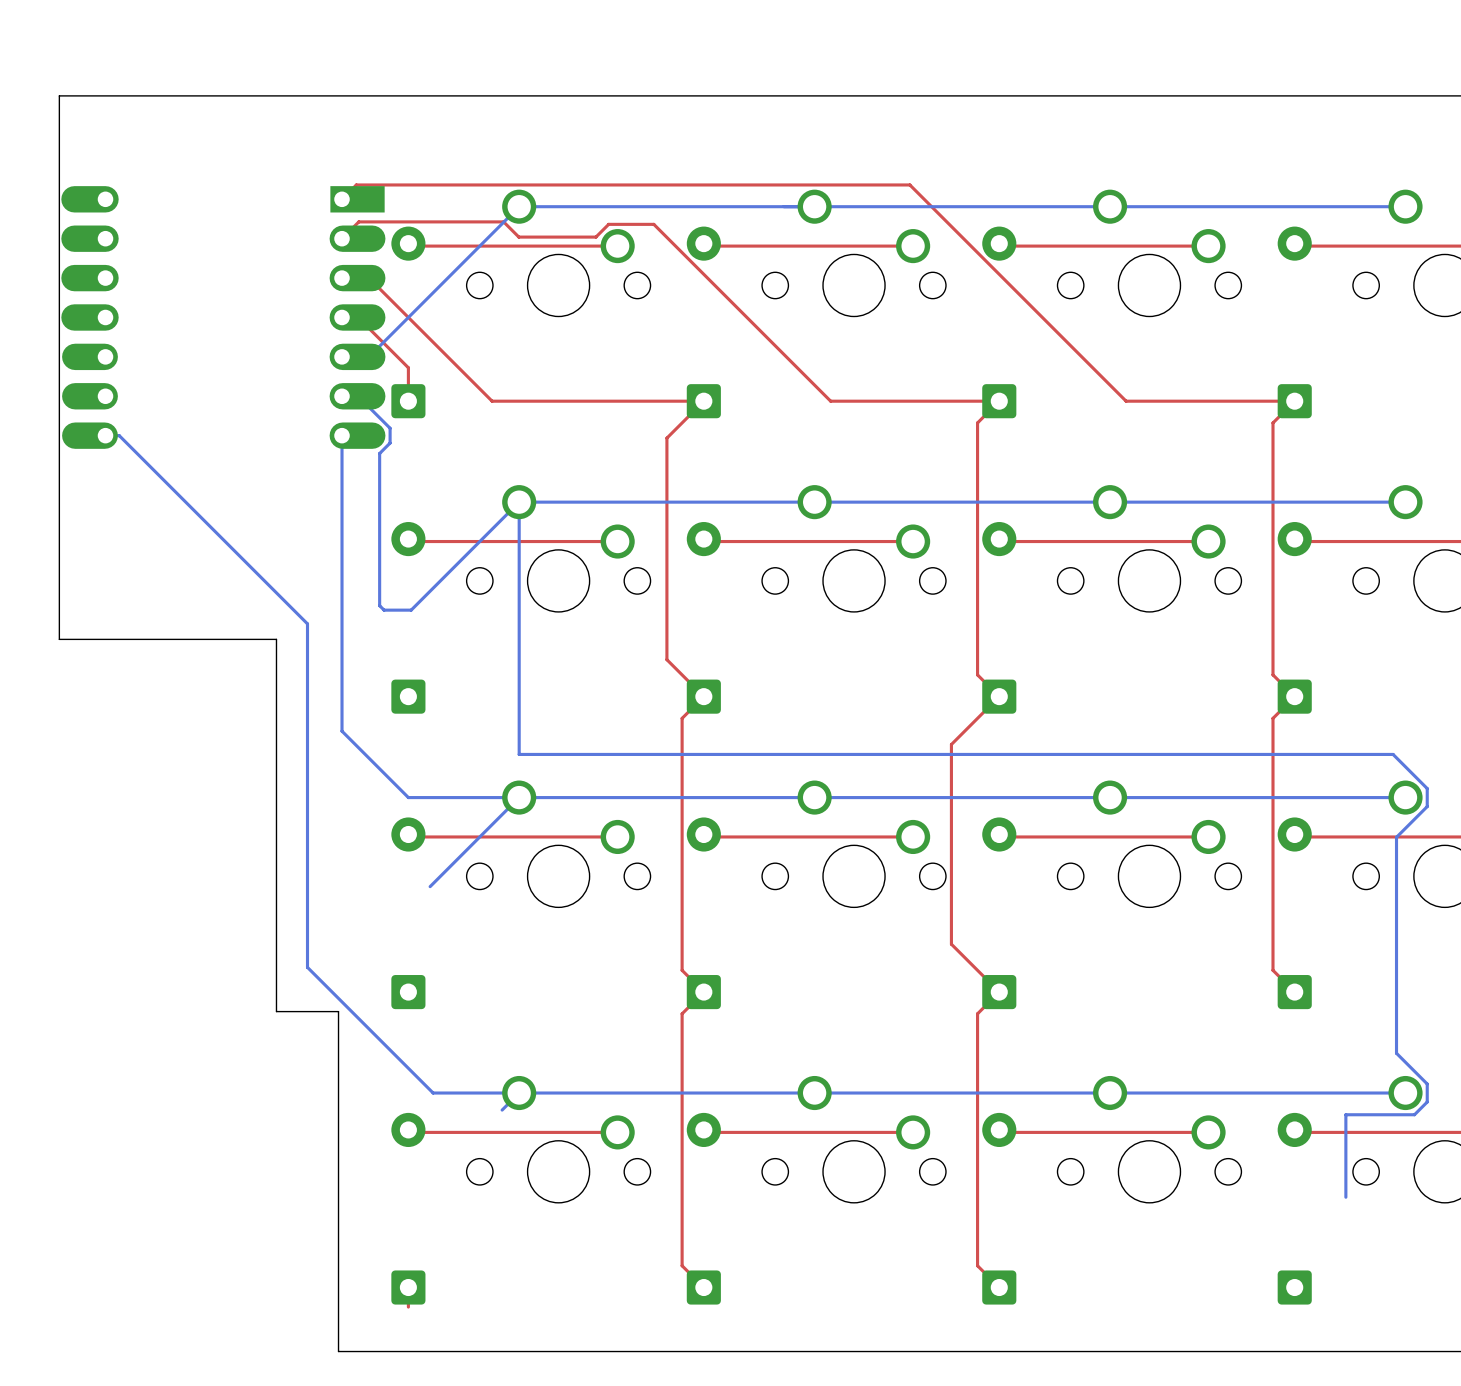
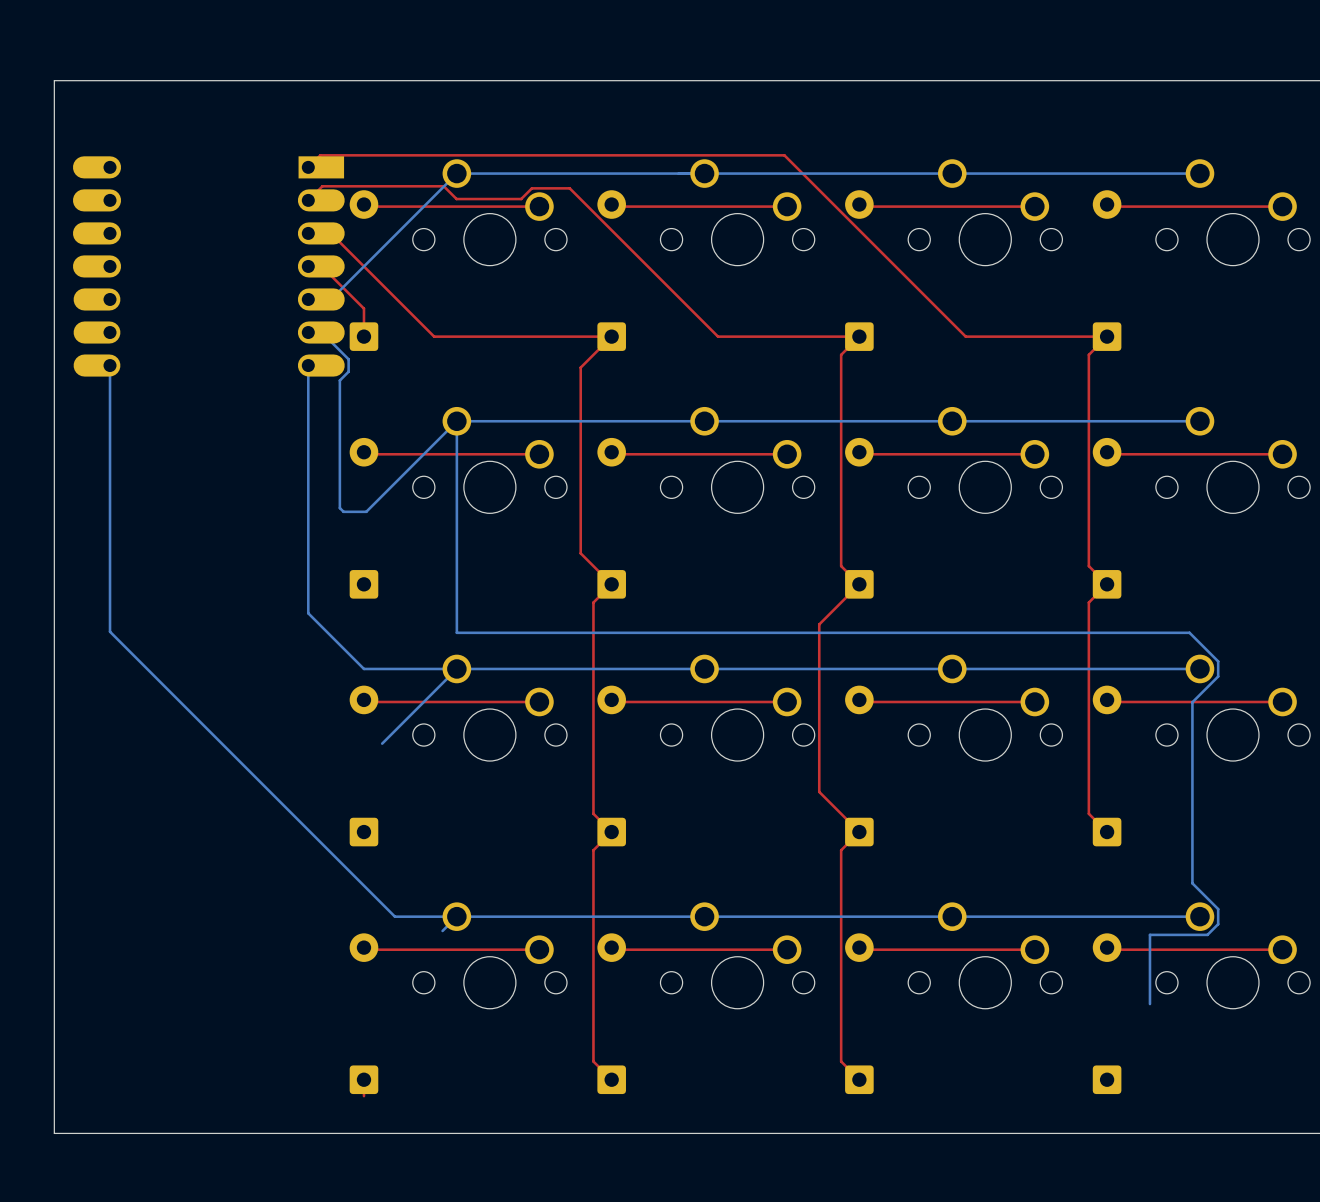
board edge: (59, 95) (59, 639) (276, 639) (276, 1011) (338, 1011) (338, 1351) -> (71, 80) (54, 80) (54, 1133) (305, 1133)
bottom track: (105, 435) (119, 435) (307, 623) (307, 967) (433, 1093) (445, 1093) -> (110, 365) (110, 631) (394, 916)

